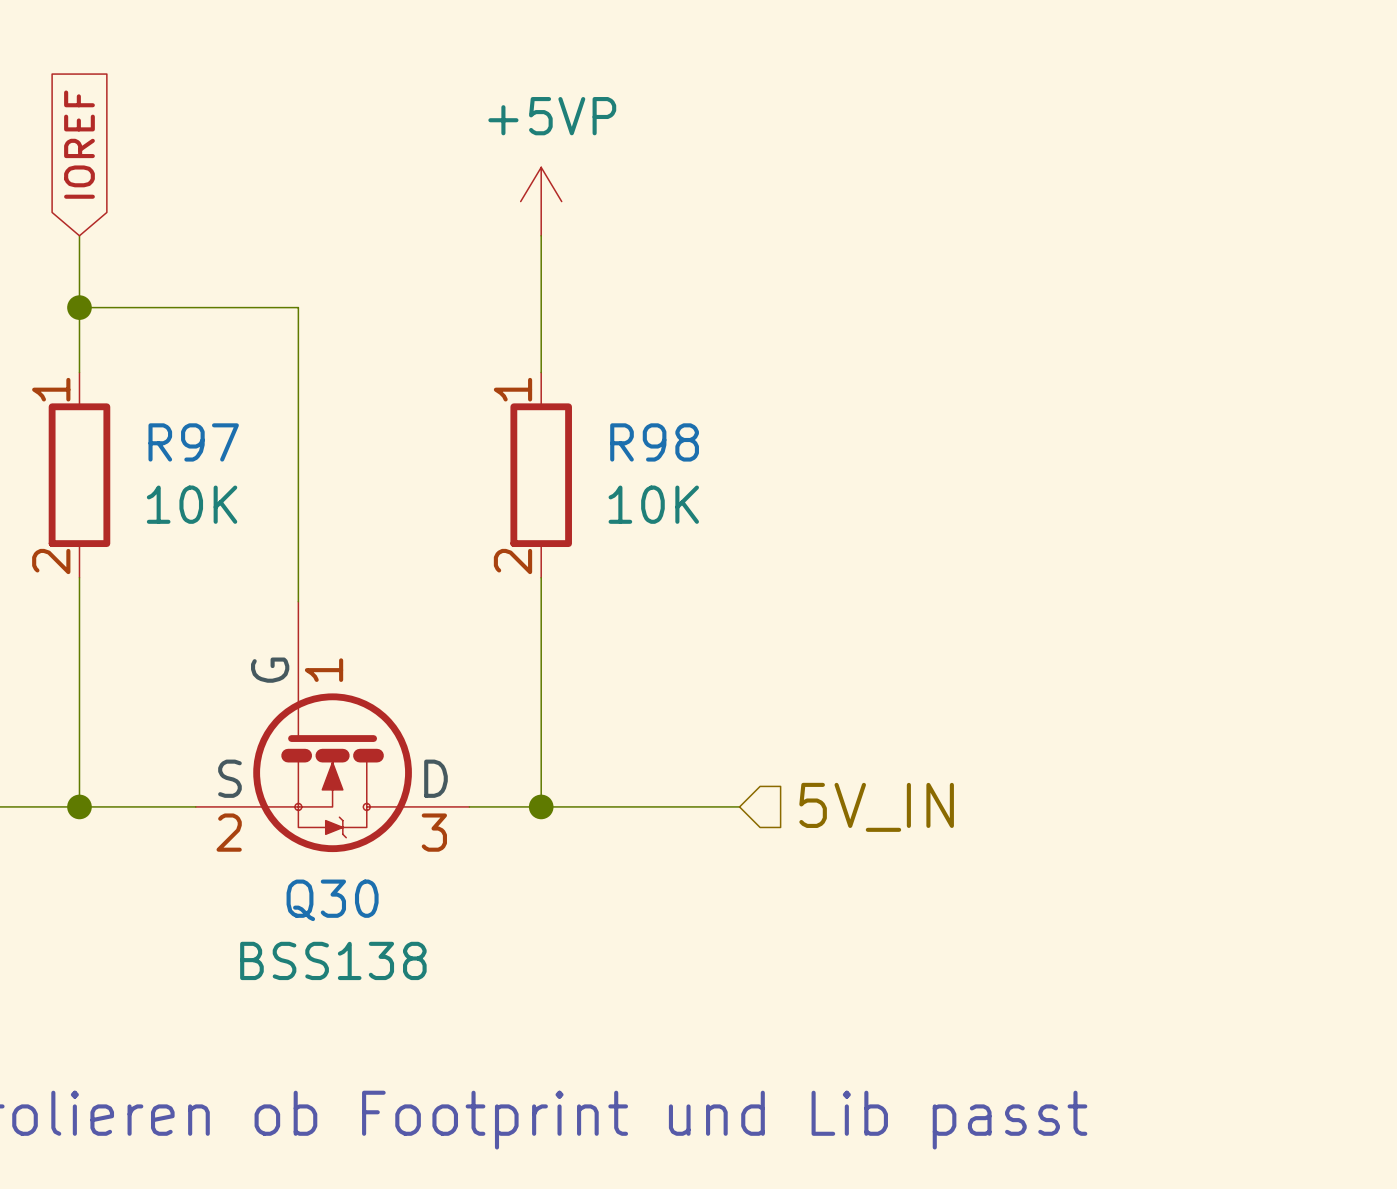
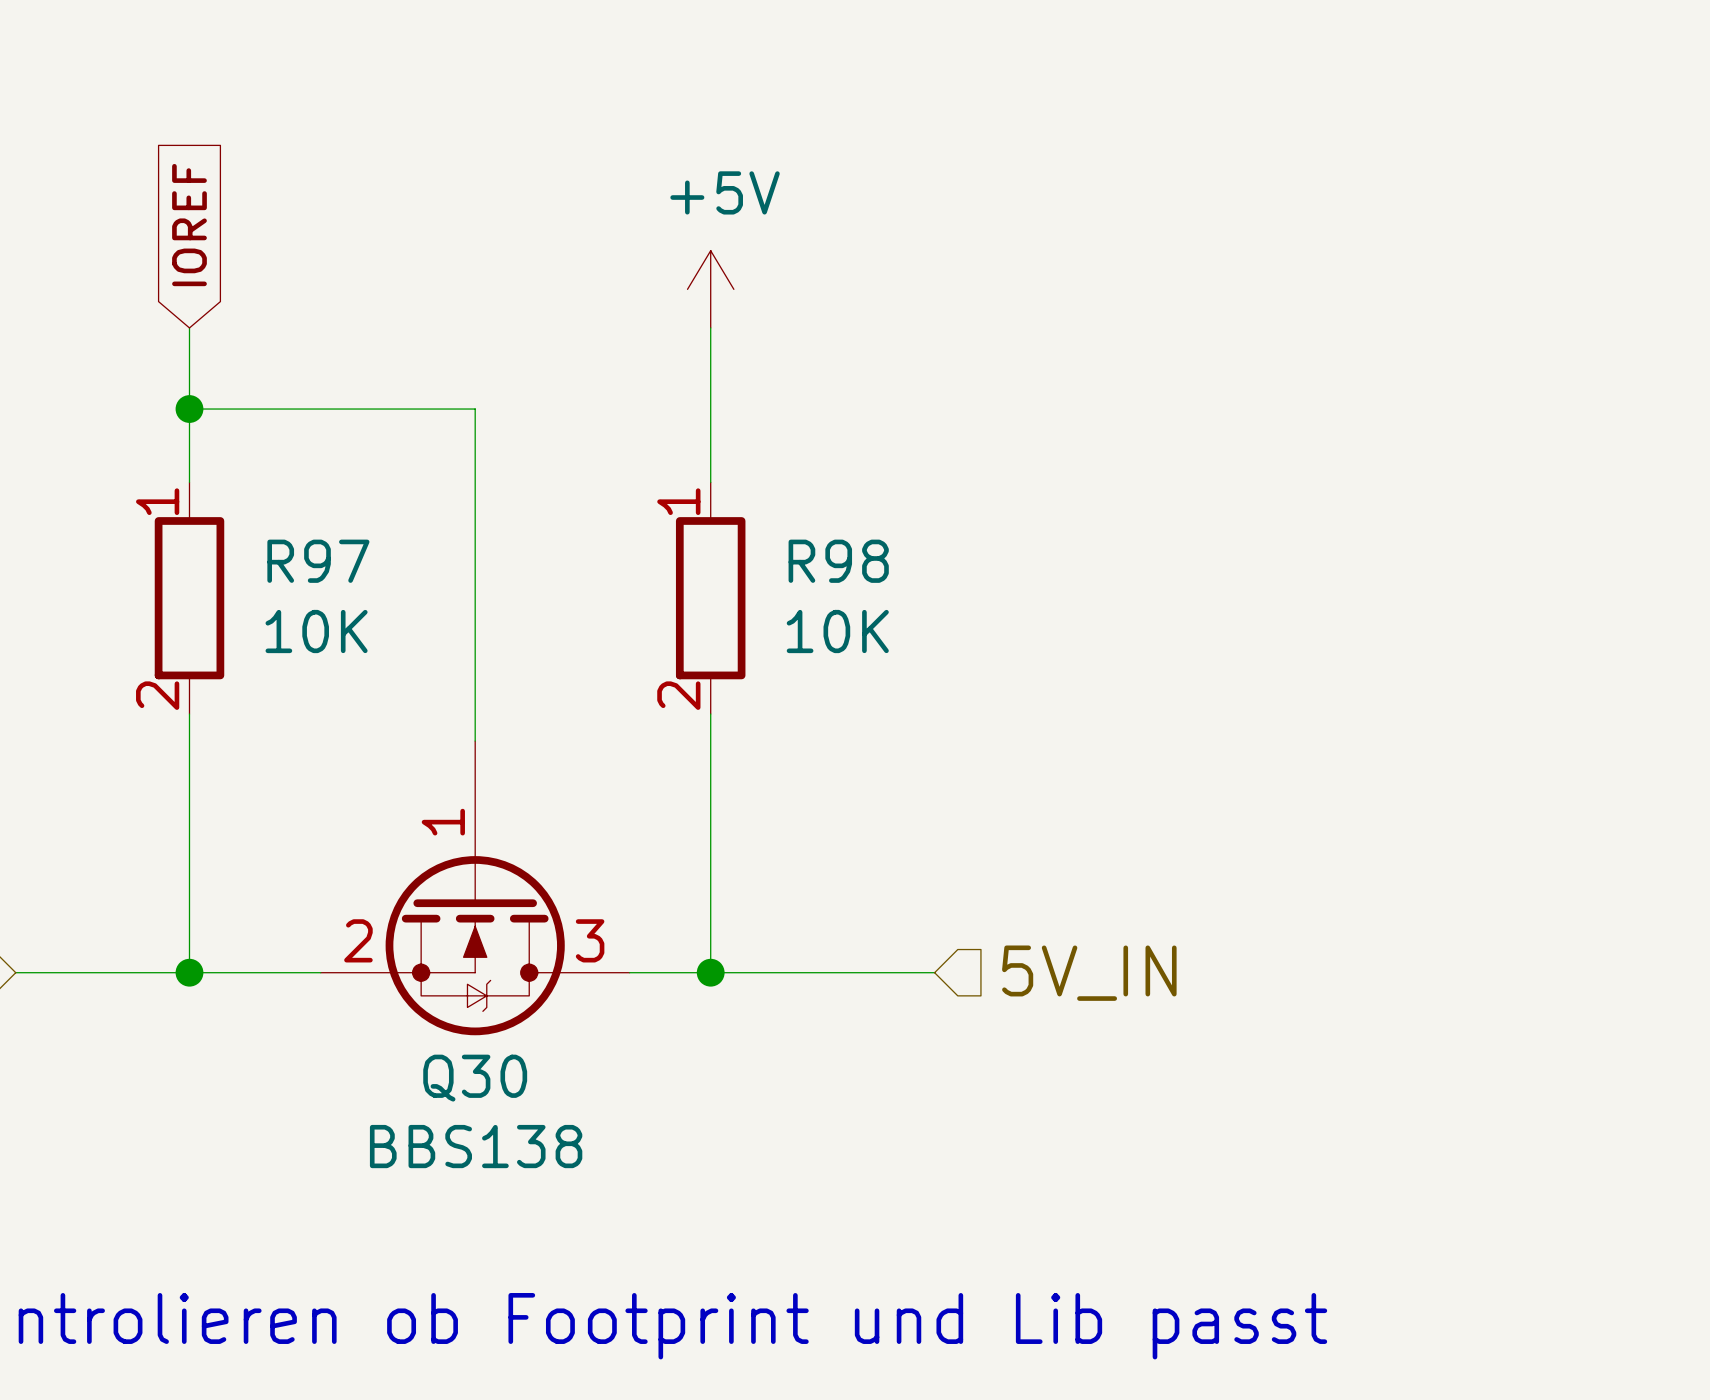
power symbol: +5VP (541, 201) -> +5V (710, 289)
wire: (298, 307) (298, 601) -> (436, 409) (475, 409) (475, 741)
Q30 symbol: [195, 601, 470, 853] -> [320, 741, 630, 1036]
Q30 value: BSS138 (333, 960) -> BBS138 (476, 1146)

